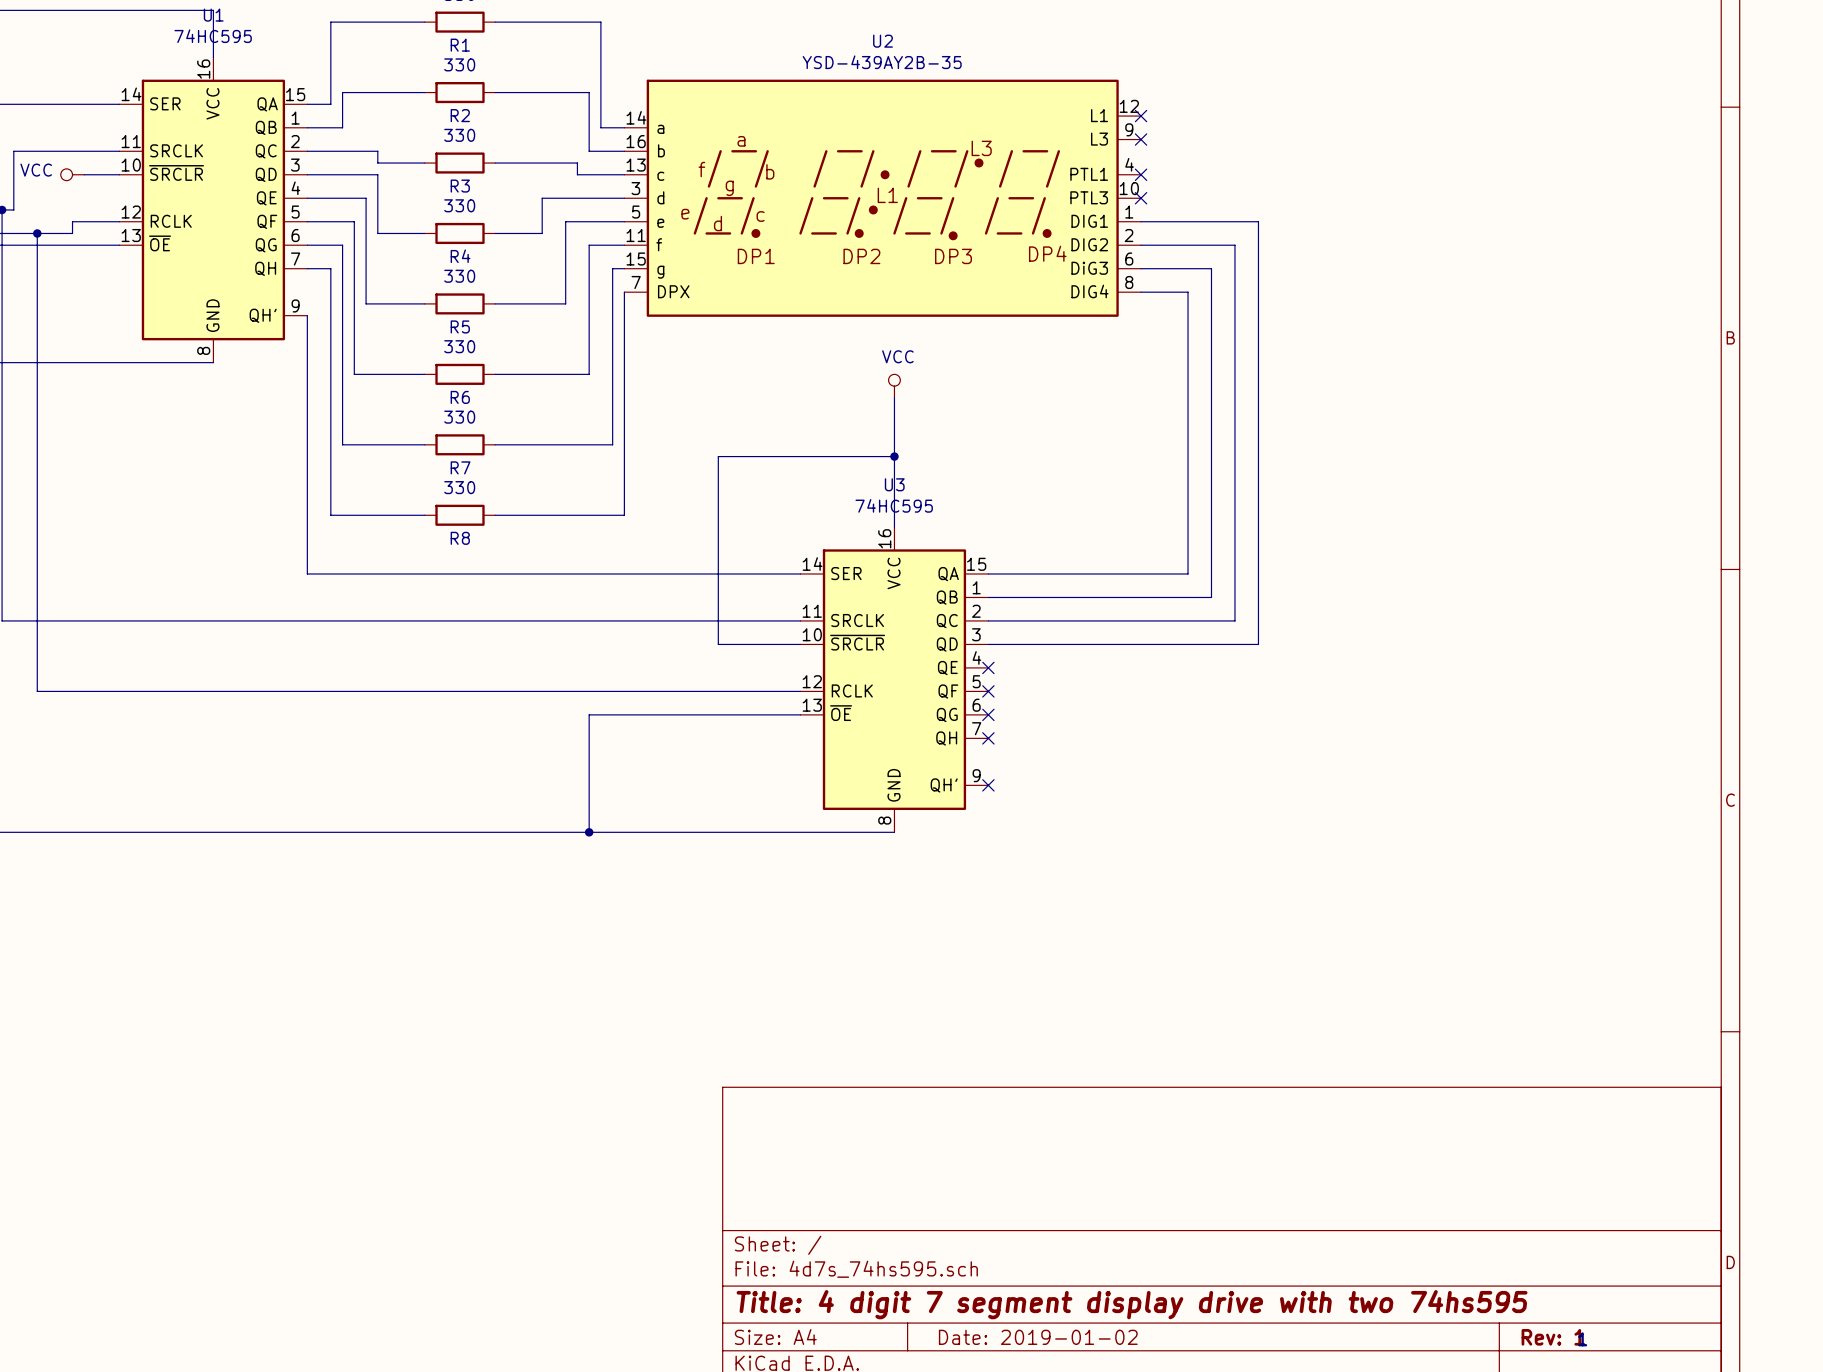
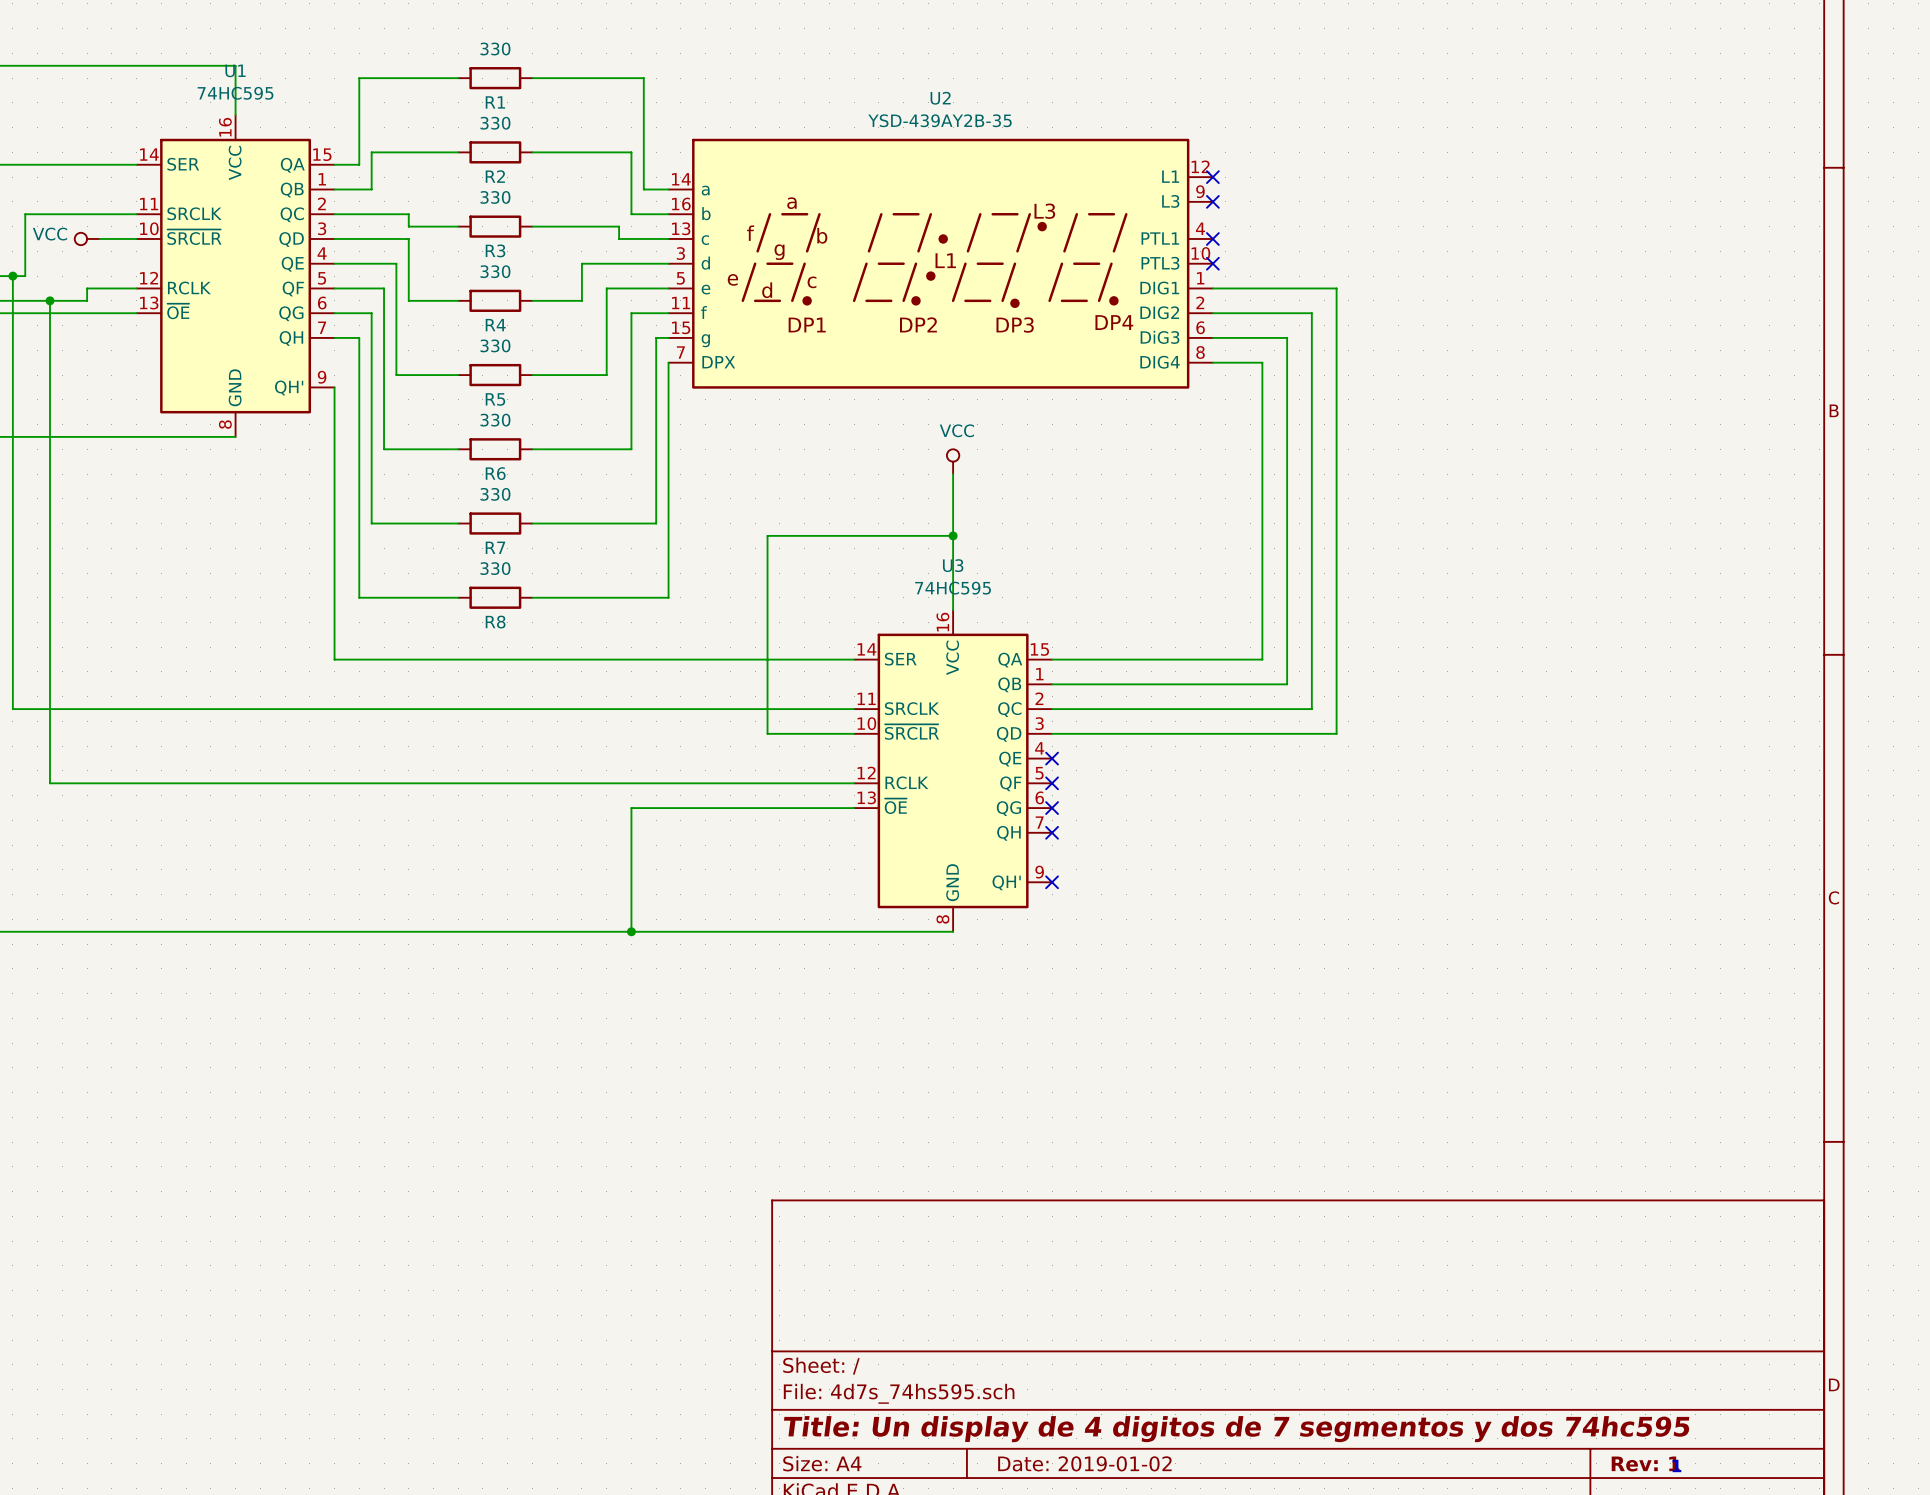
title block: Title: 4 digit 7 segment display drive with two 74hs595 (1132, 1304) -> Title: Un display de 4 digitos de 7 segmentos y dos 74hc595 (1236, 1429)

